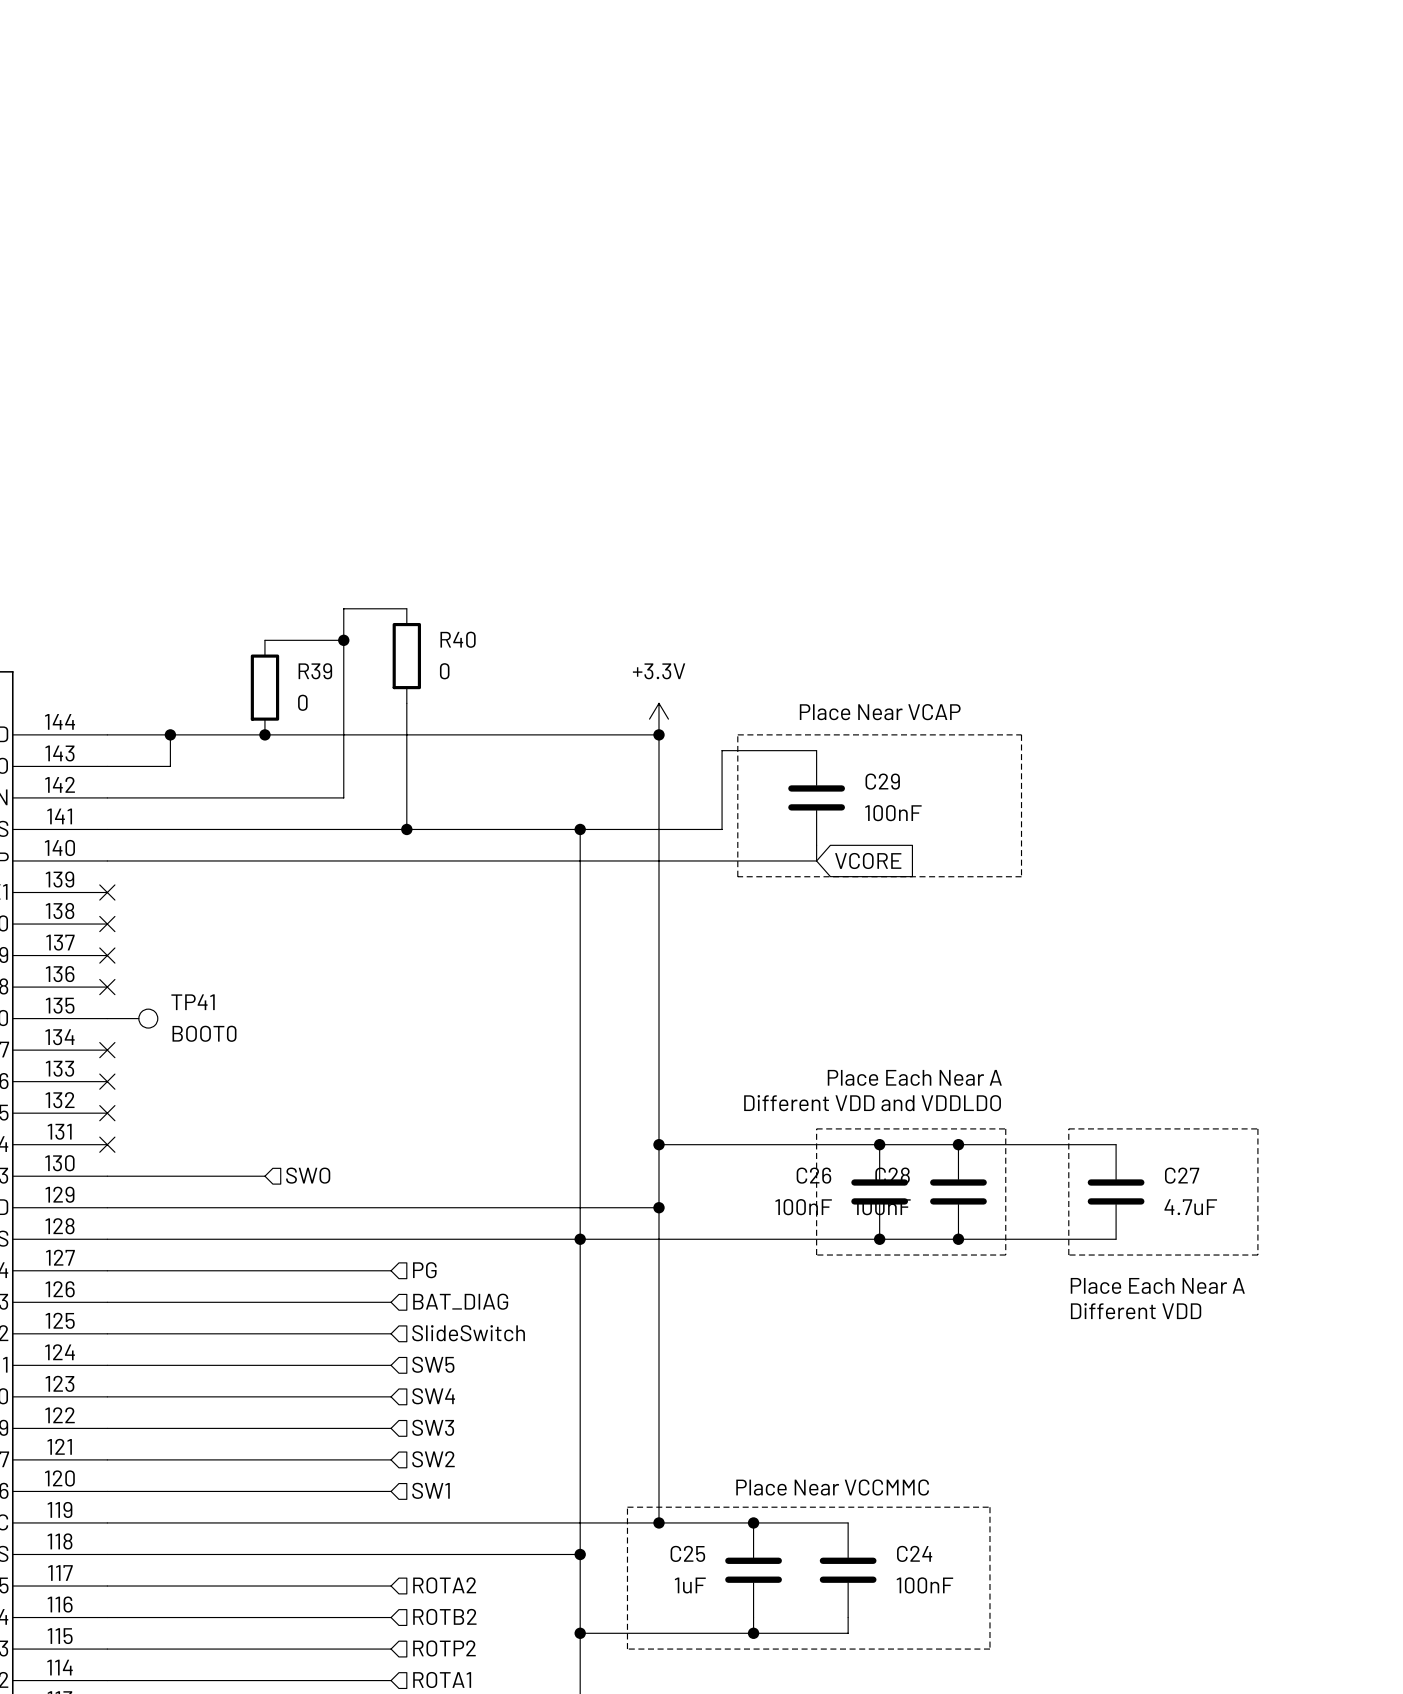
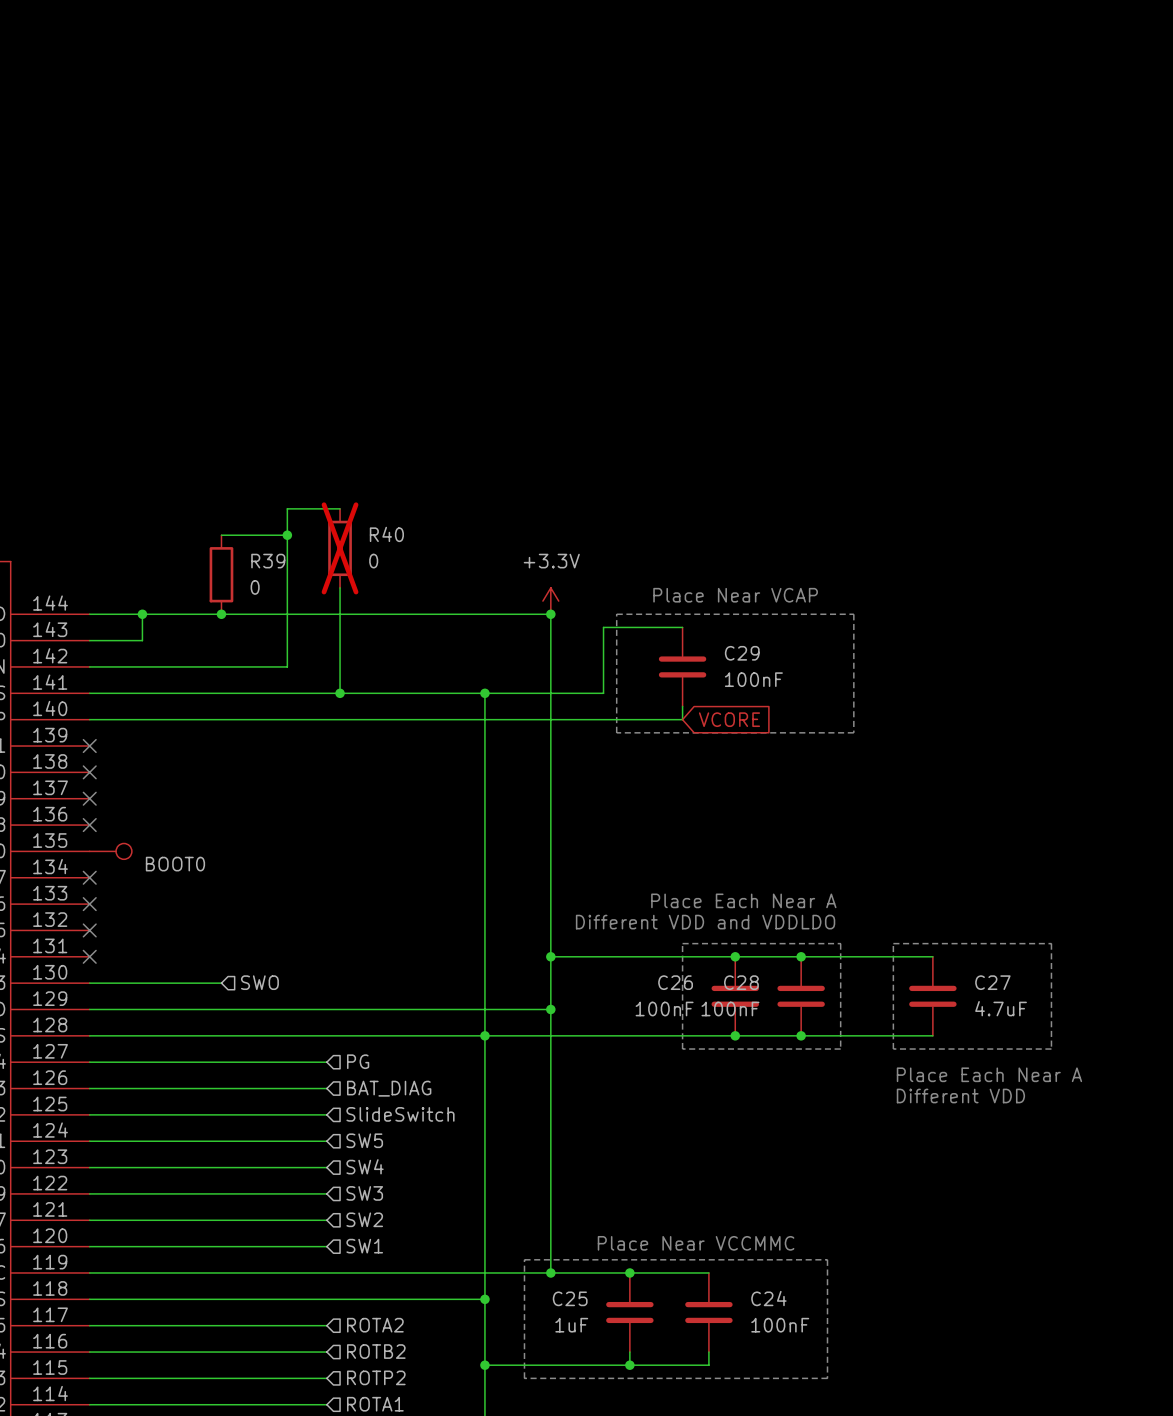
R40 do-not-place cross: none -> (340, 548)
TP41 name: TP41 (193, 1002) -> none

